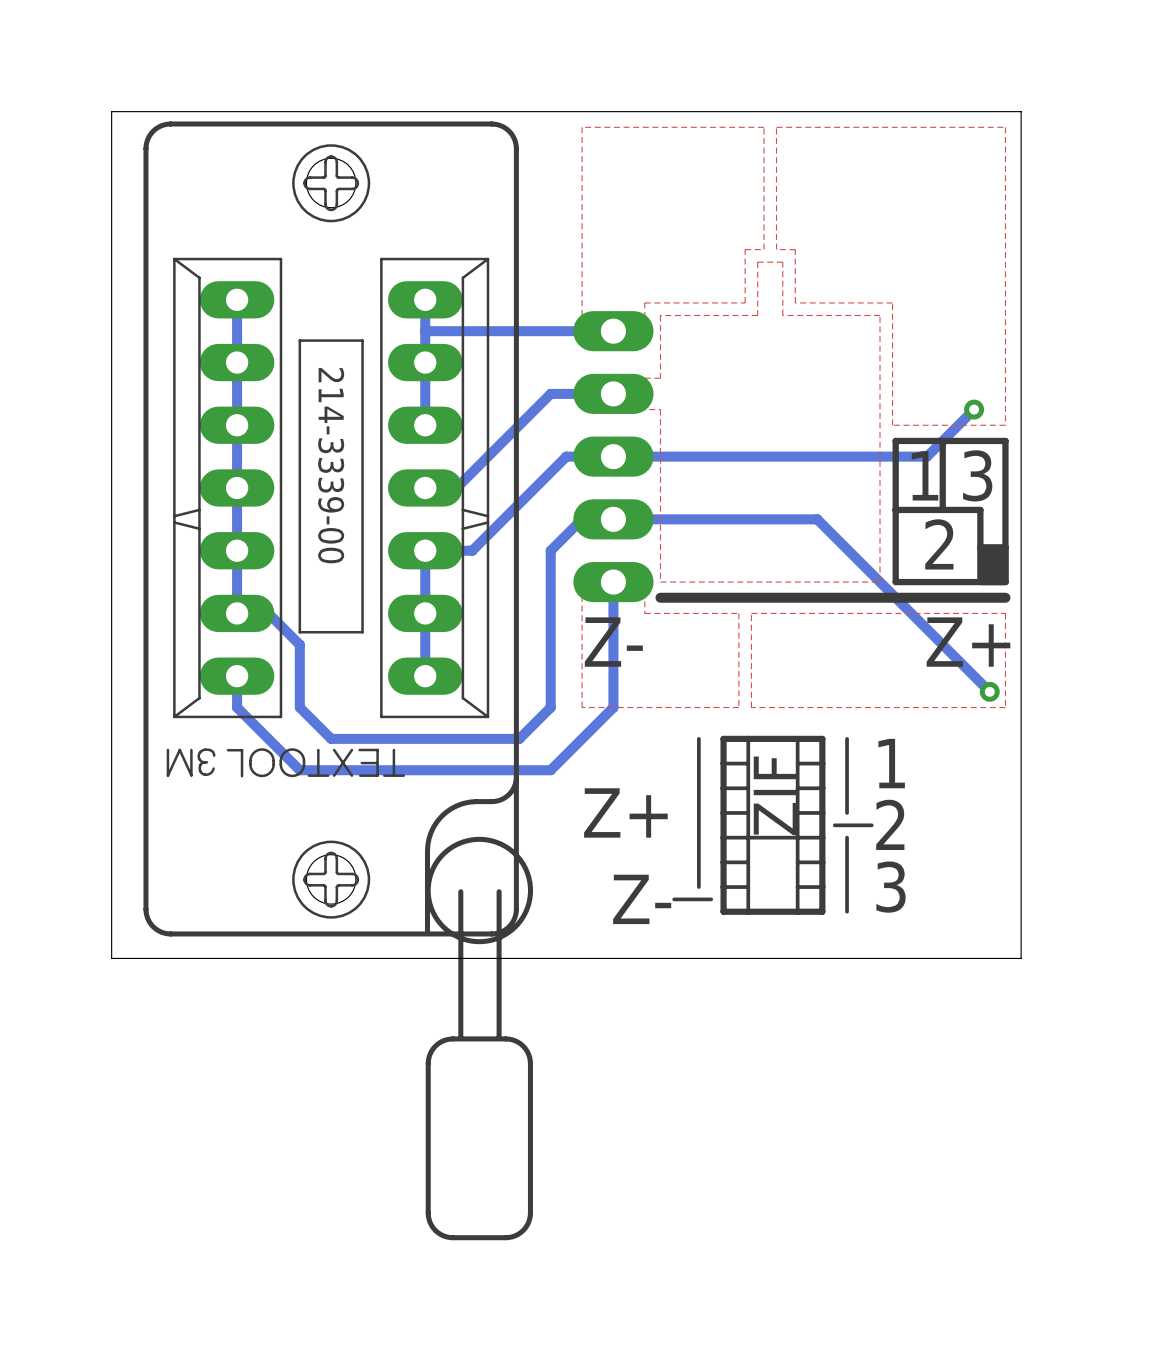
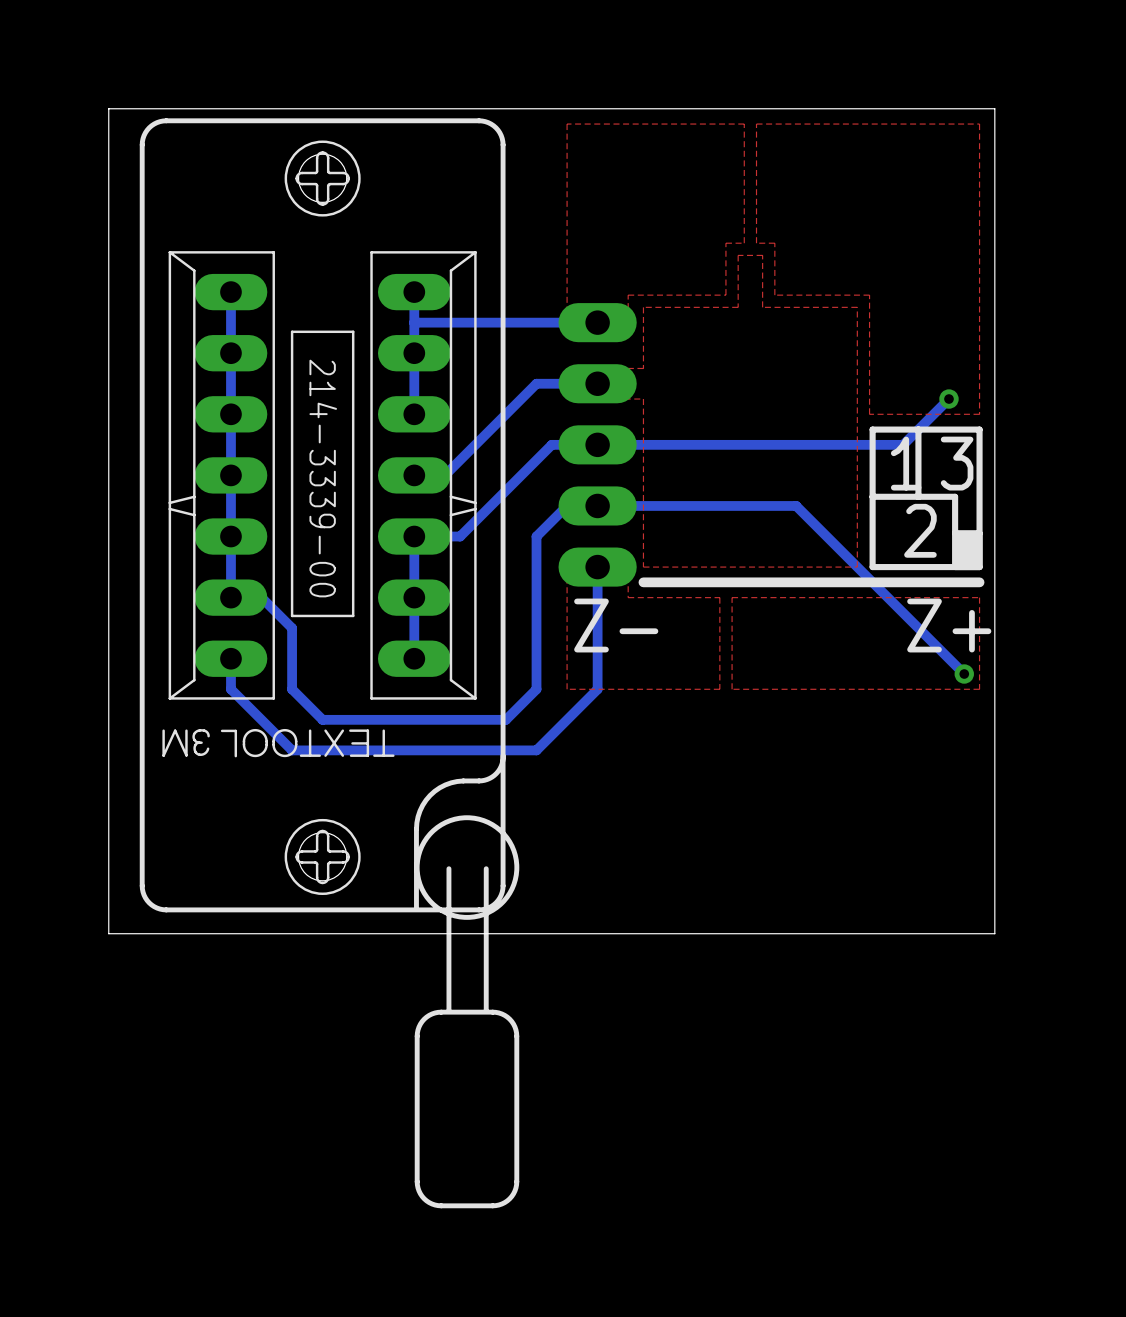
line: (698, 738) (698, 887) -> none
line: (723, 738) (822, 738) (822, 911) (723, 911) (723, 738) -> none
line: (748, 738) (748, 911) -> none
line: (797, 738) (797, 911) -> none
line: (847, 738) (847, 812) -> none
line: (723, 763) (748, 763) -> none
line: (797, 763) (822, 763) -> none
text: 1 (891, 763) -> none
line: (723, 788) (748, 788) -> none
line: (797, 788) (822, 788) -> none
text: ZIF (775, 795) -> none
text: Z+ (625, 812) -> none
line: (723, 812) (748, 812) -> none
line: (797, 812) (822, 812) -> none
text: 2 (890, 824) -> none
line: (834, 825) (871, 825) -> none
line: (723, 837) (822, 837) -> none
line: (847, 837) (847, 911) -> none
line: (723, 862) (748, 862) -> none
line: (797, 862) (822, 862) -> none
line: (723, 887) (748, 887) -> none
line: (797, 887) (822, 887) -> none
text: 3 (891, 887) -> none
text: Z- (642, 899) -> none
line: (674, 899) (711, 899) -> none

